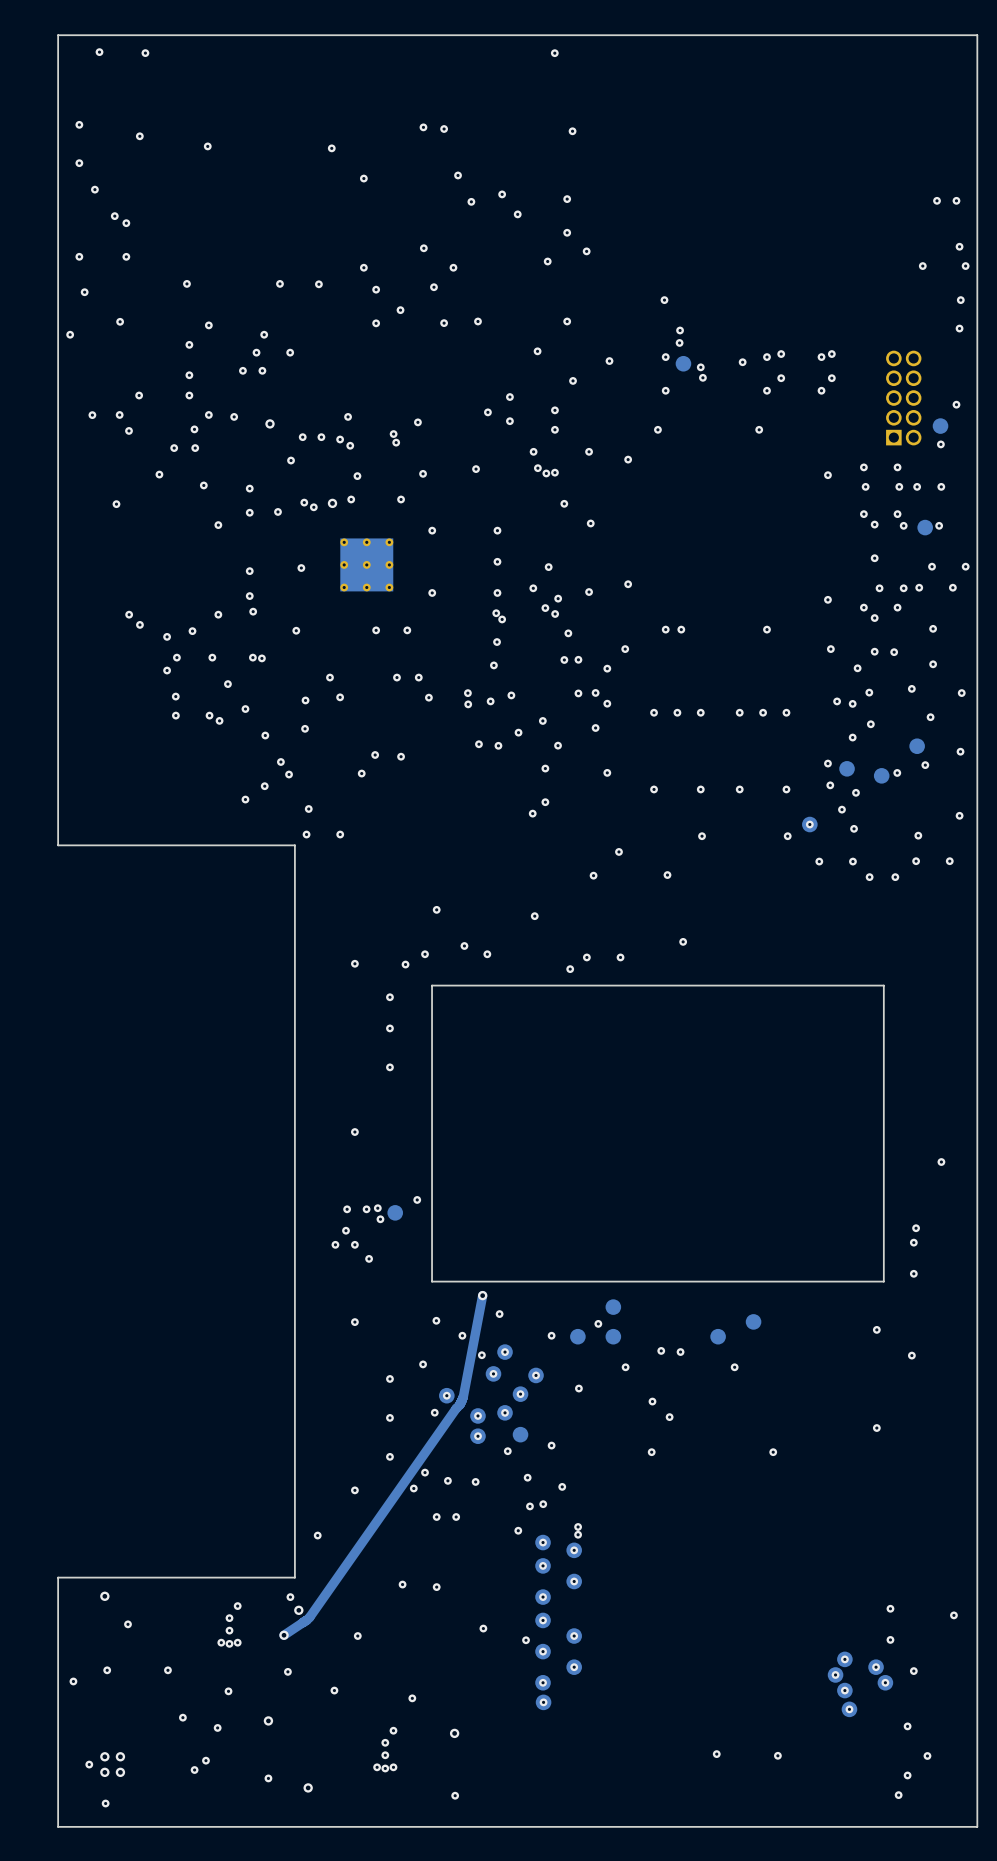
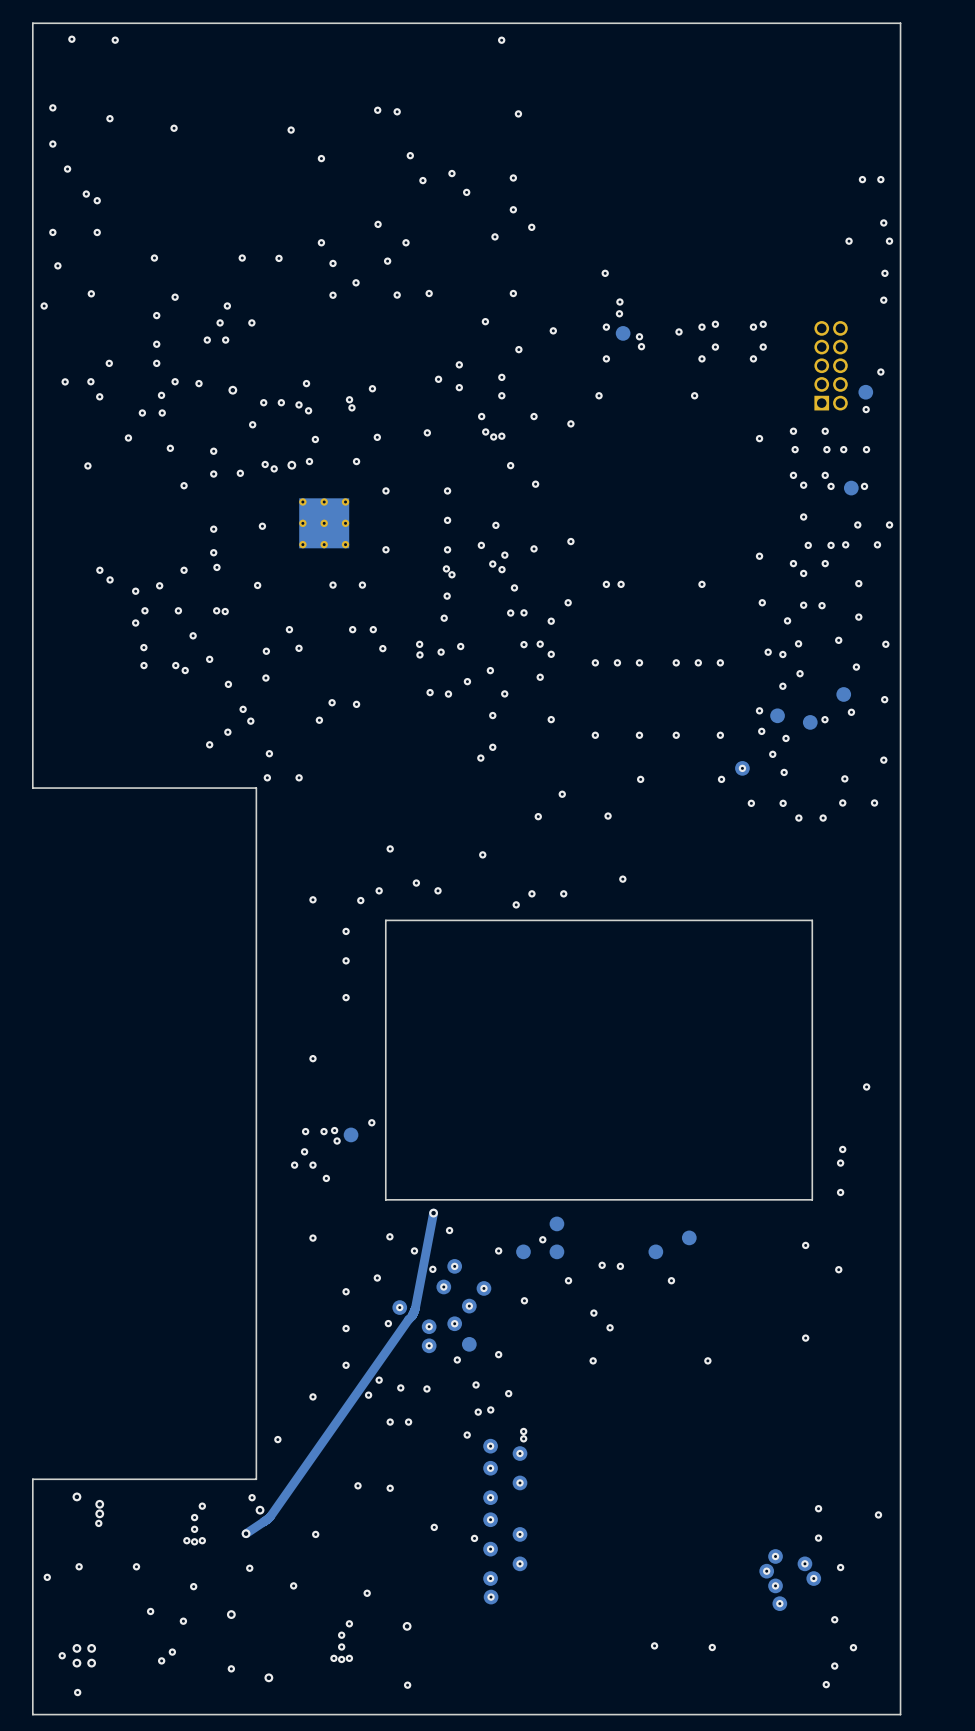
via: none -> (99, 1504)
via: none -> (99, 1513)

